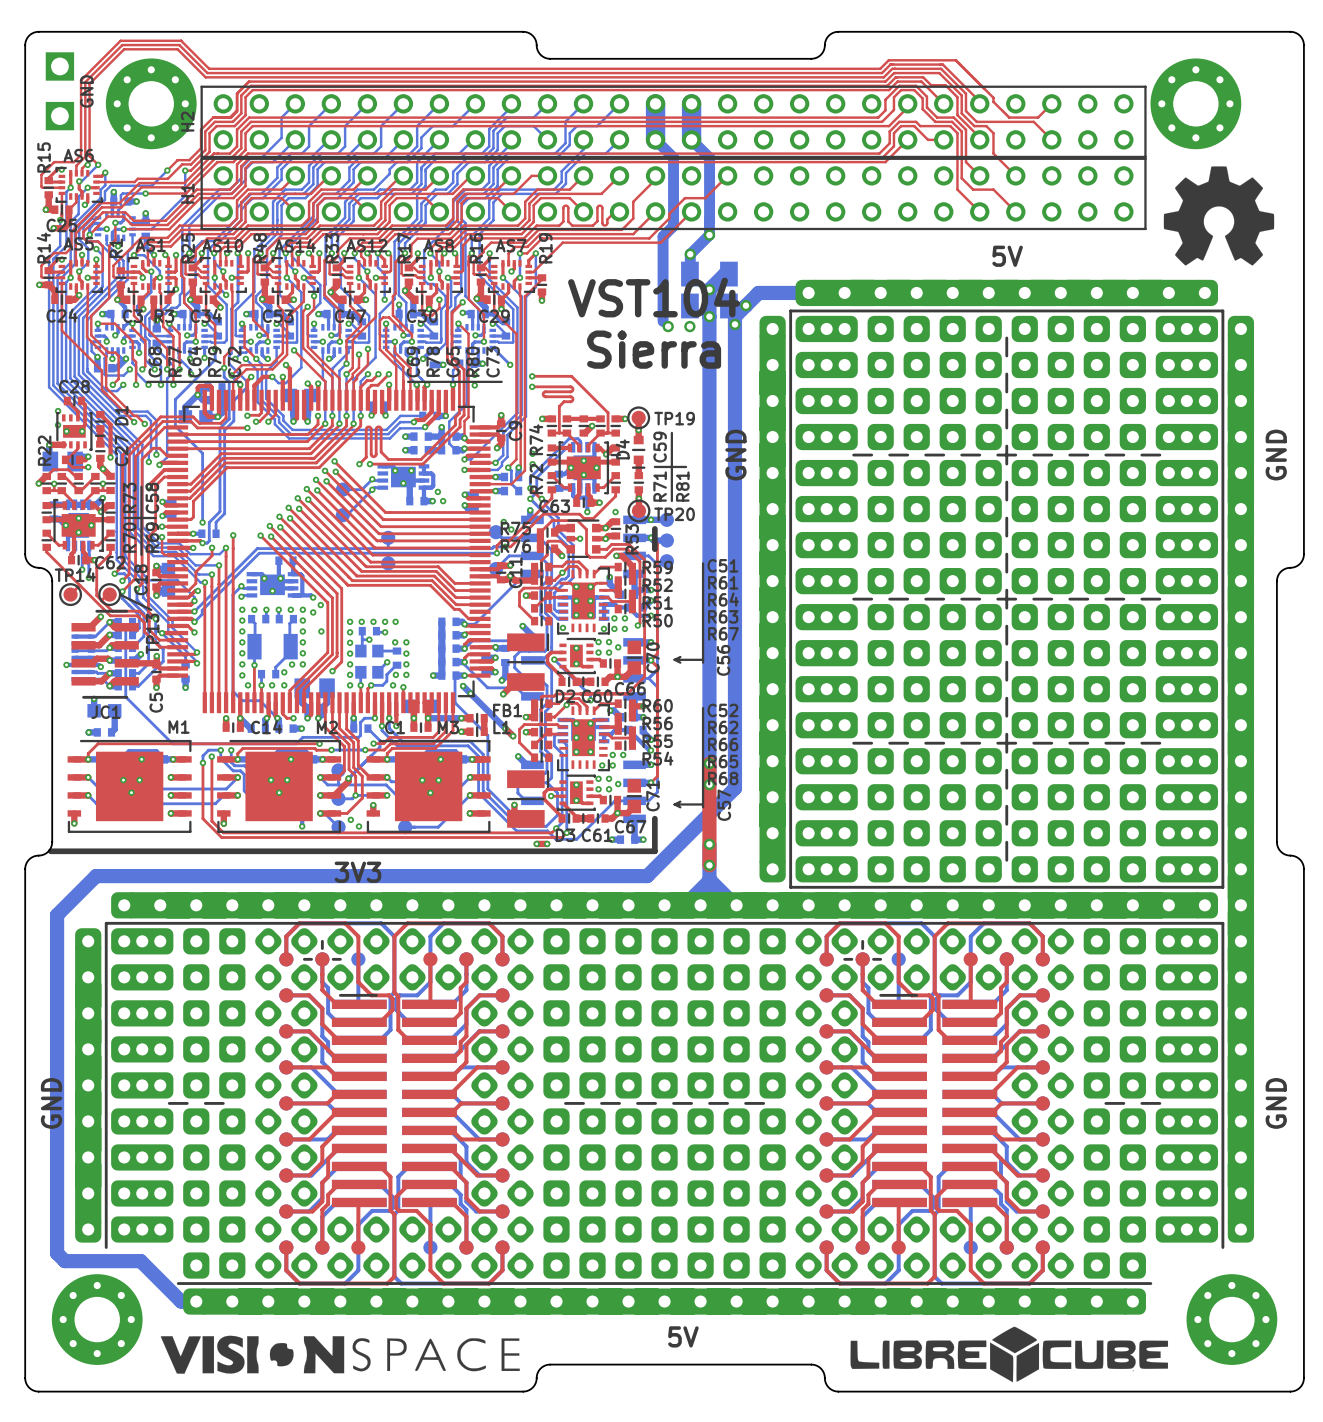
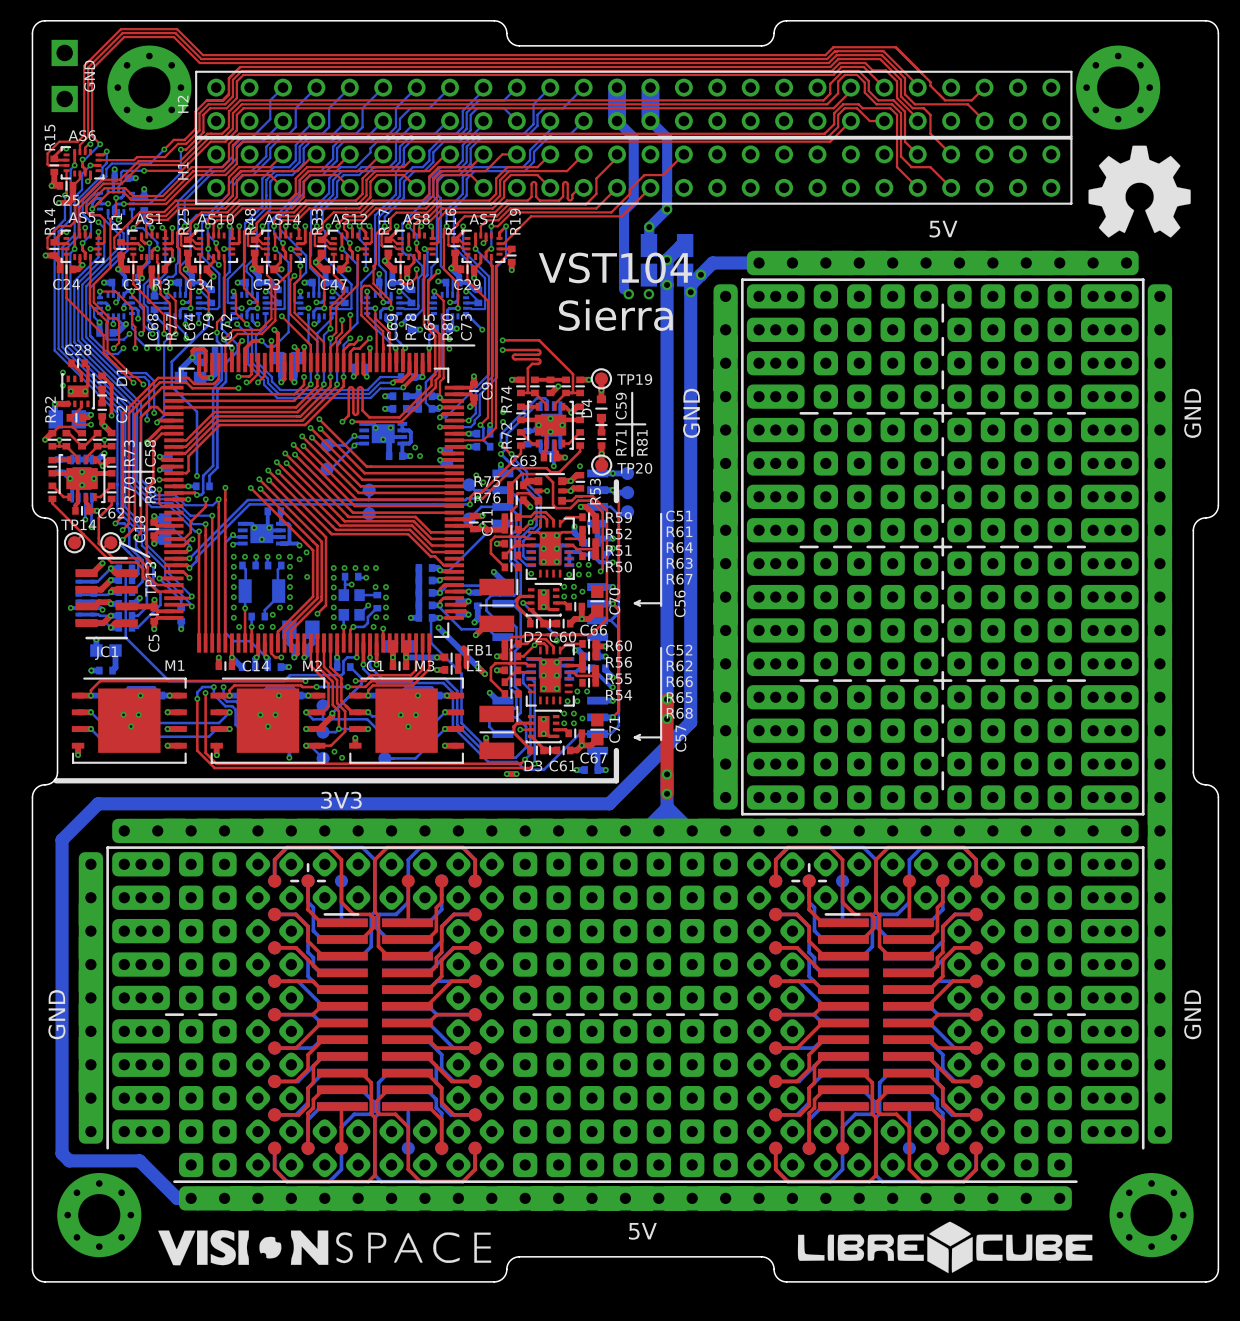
top track: none -> (463, 648) (466, 651) (466, 666)

